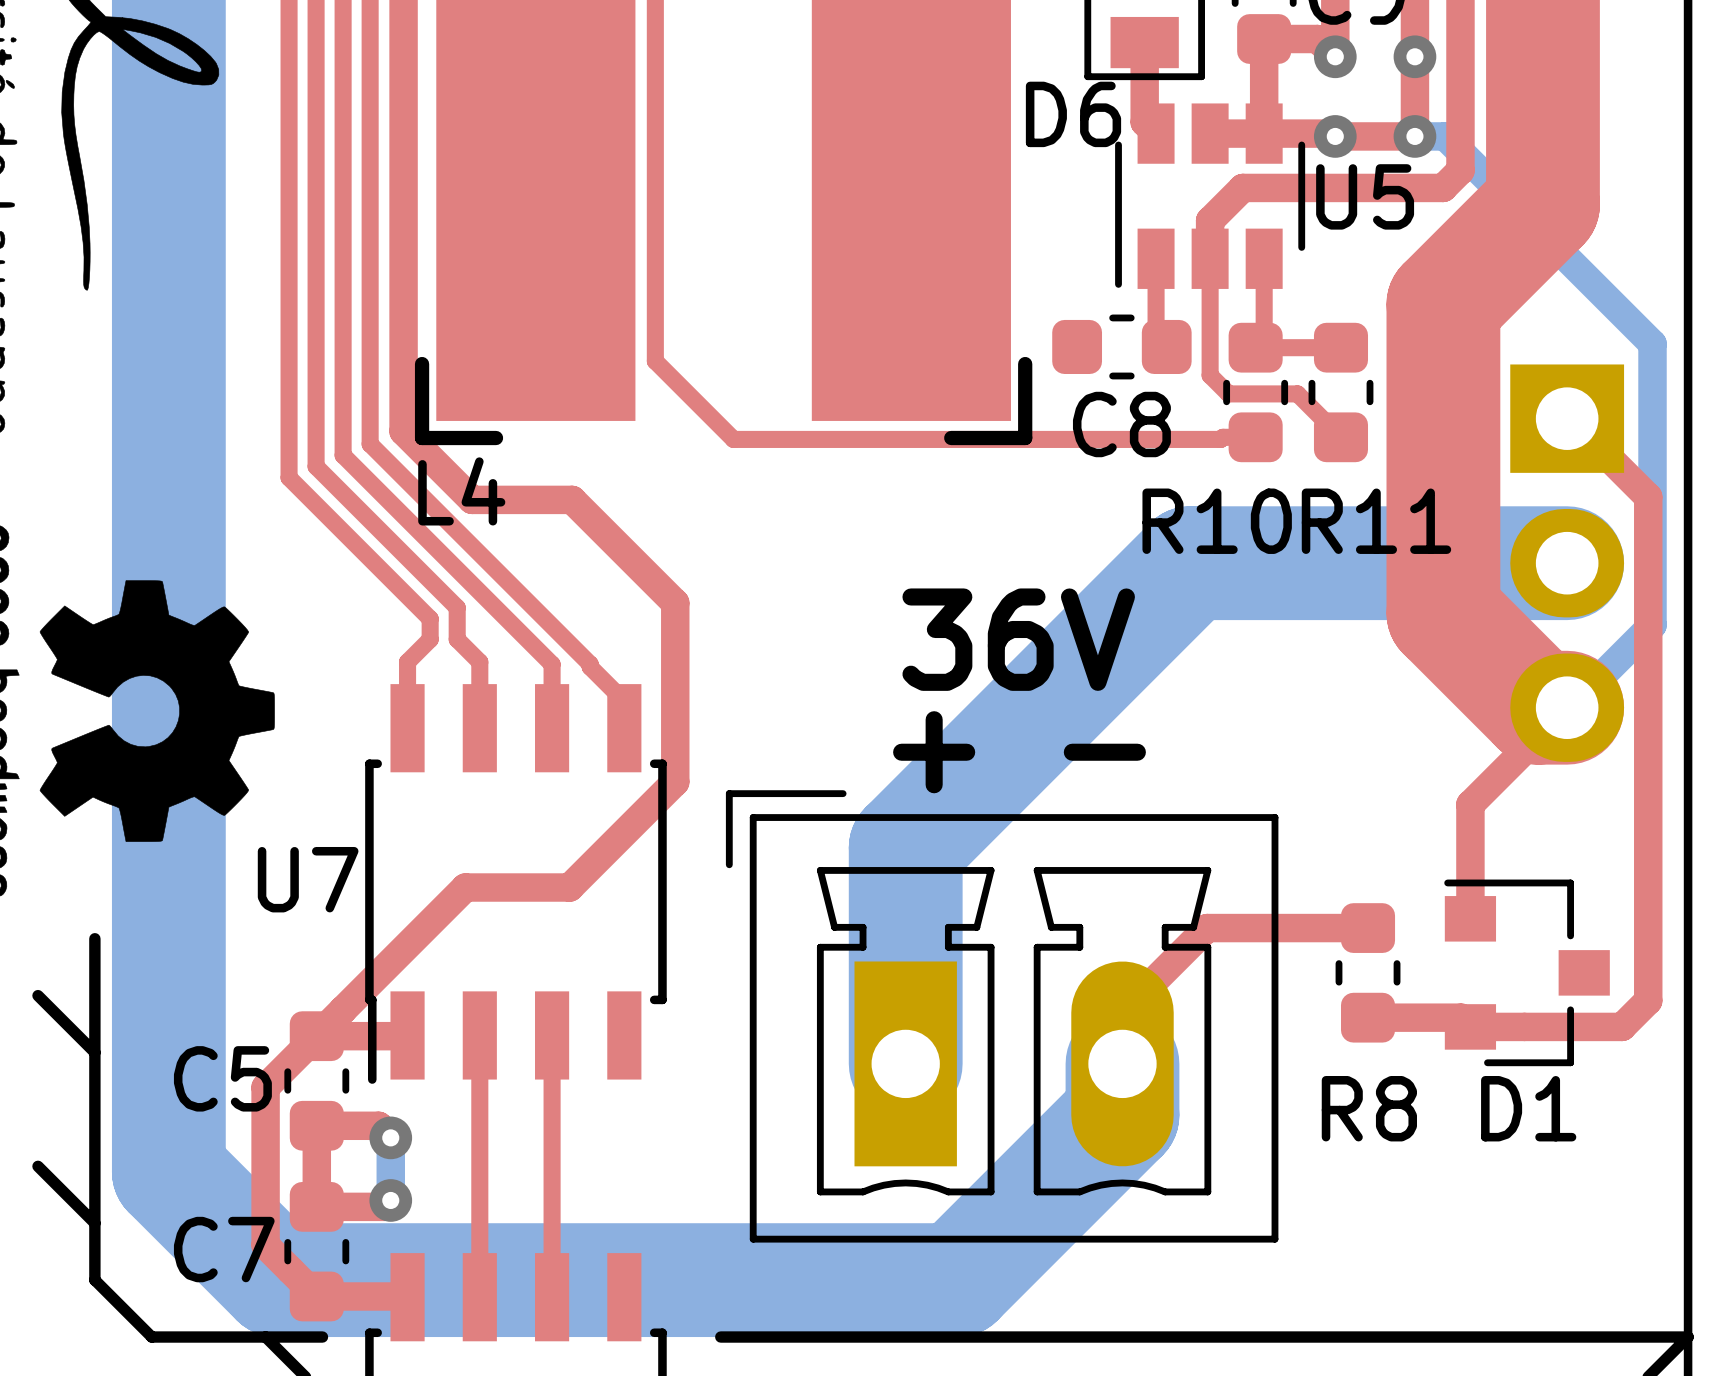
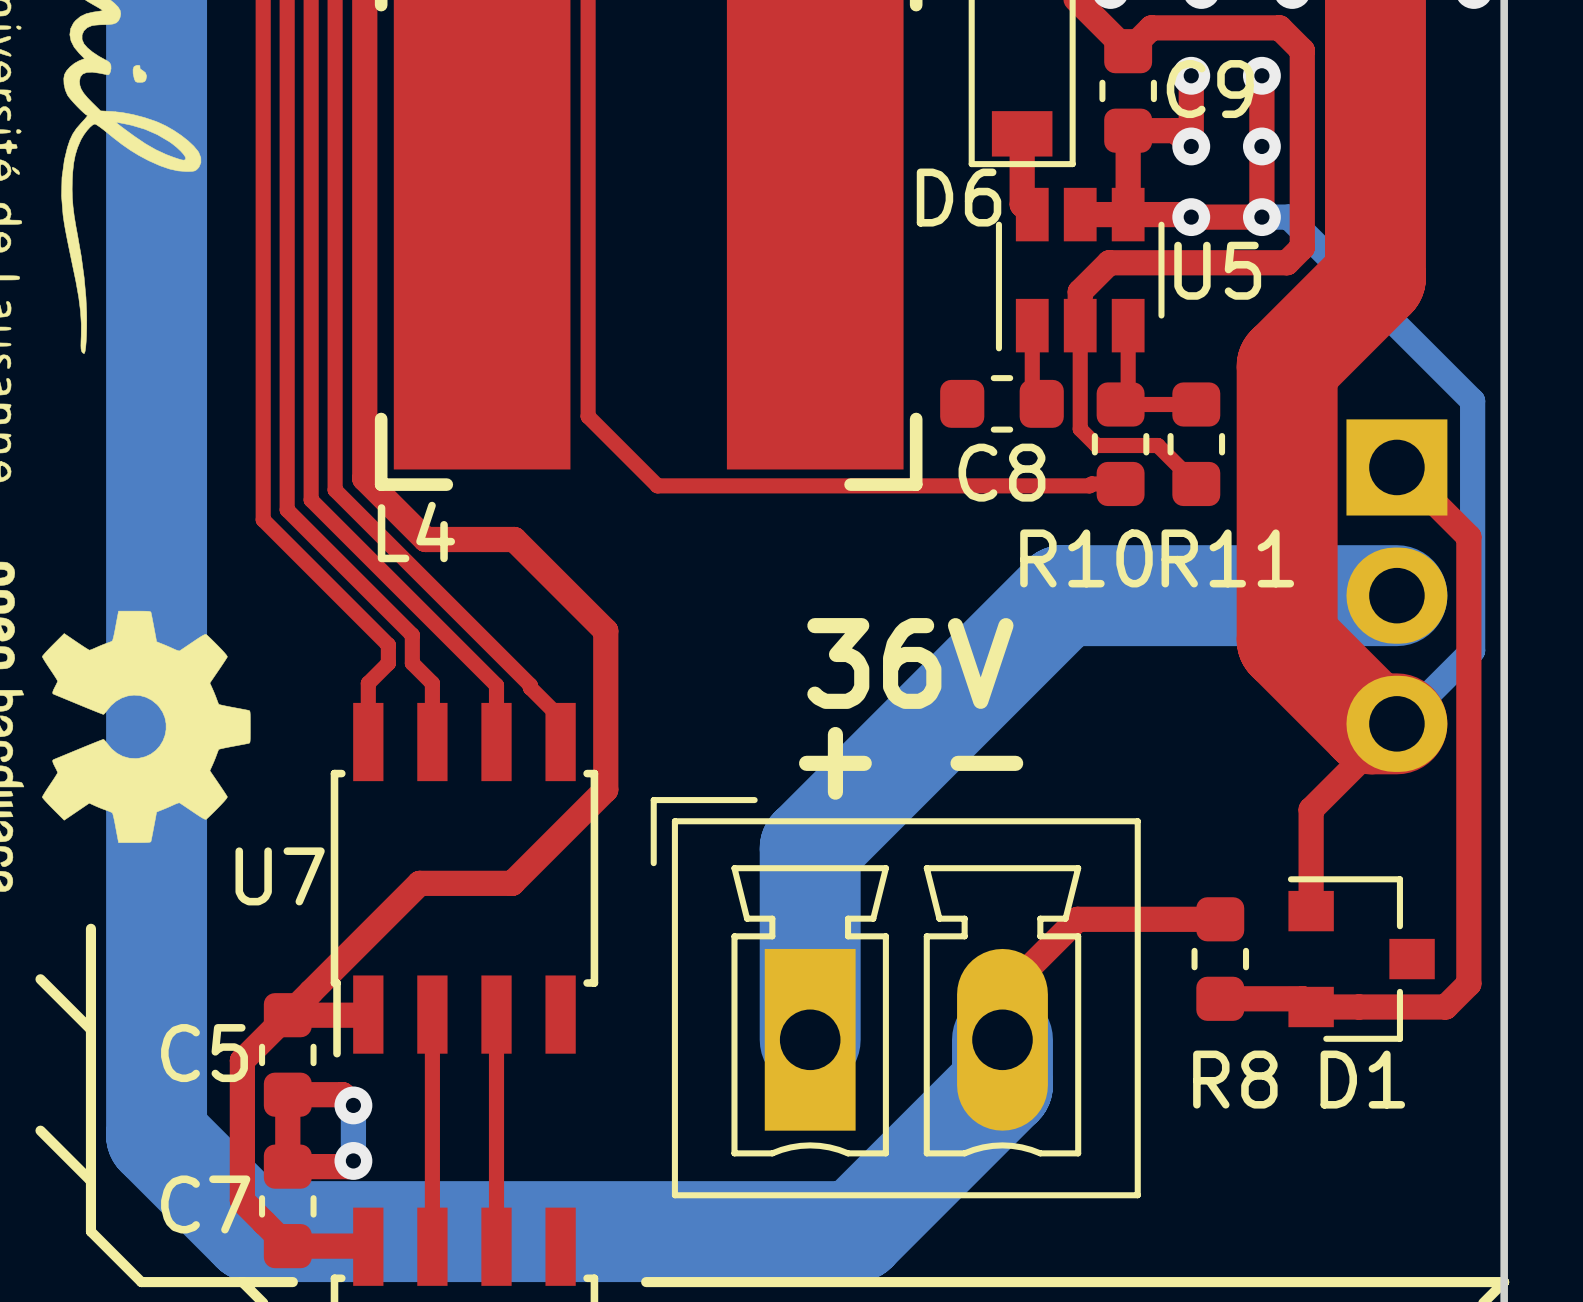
R8 name position: R8 (1369, 1108) -> R8 (1235, 1079)

